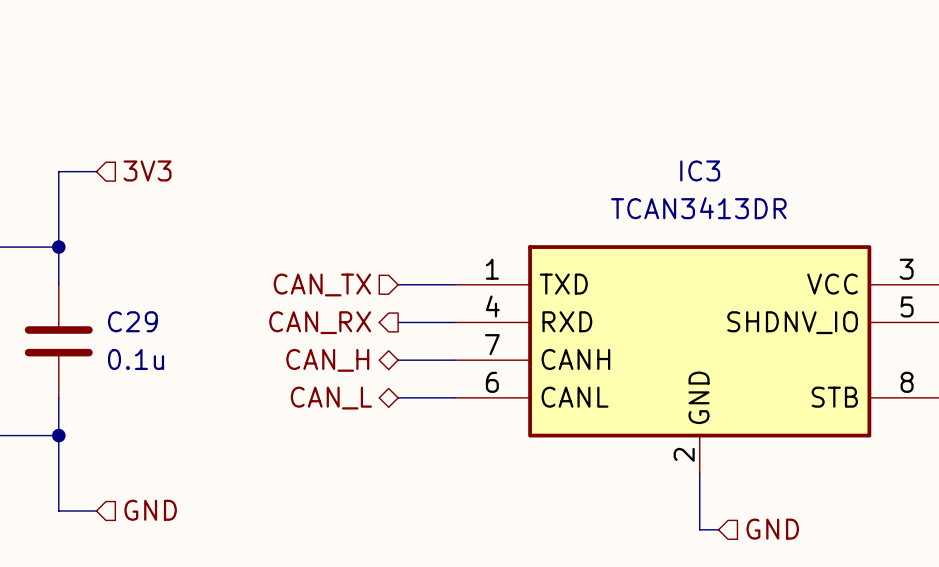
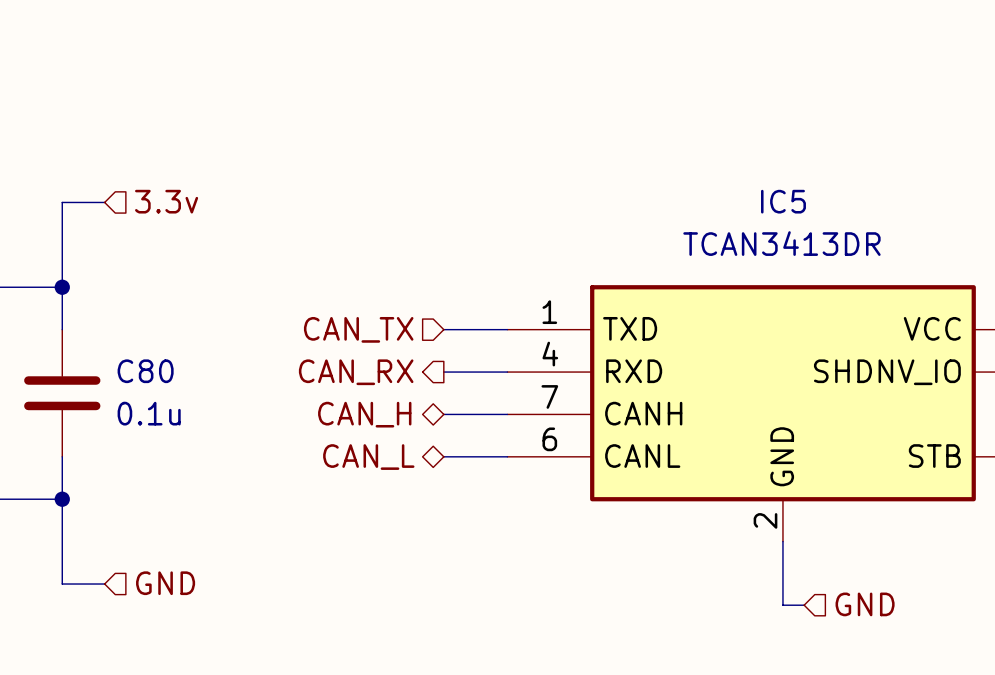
hierarchical label: 3V3 (147, 170) -> 3.3v (166, 201)
IC3 name: IC3 (700, 170) -> IC5 (783, 201)
C29 name: C29 (132, 321) -> C80 (145, 371)

